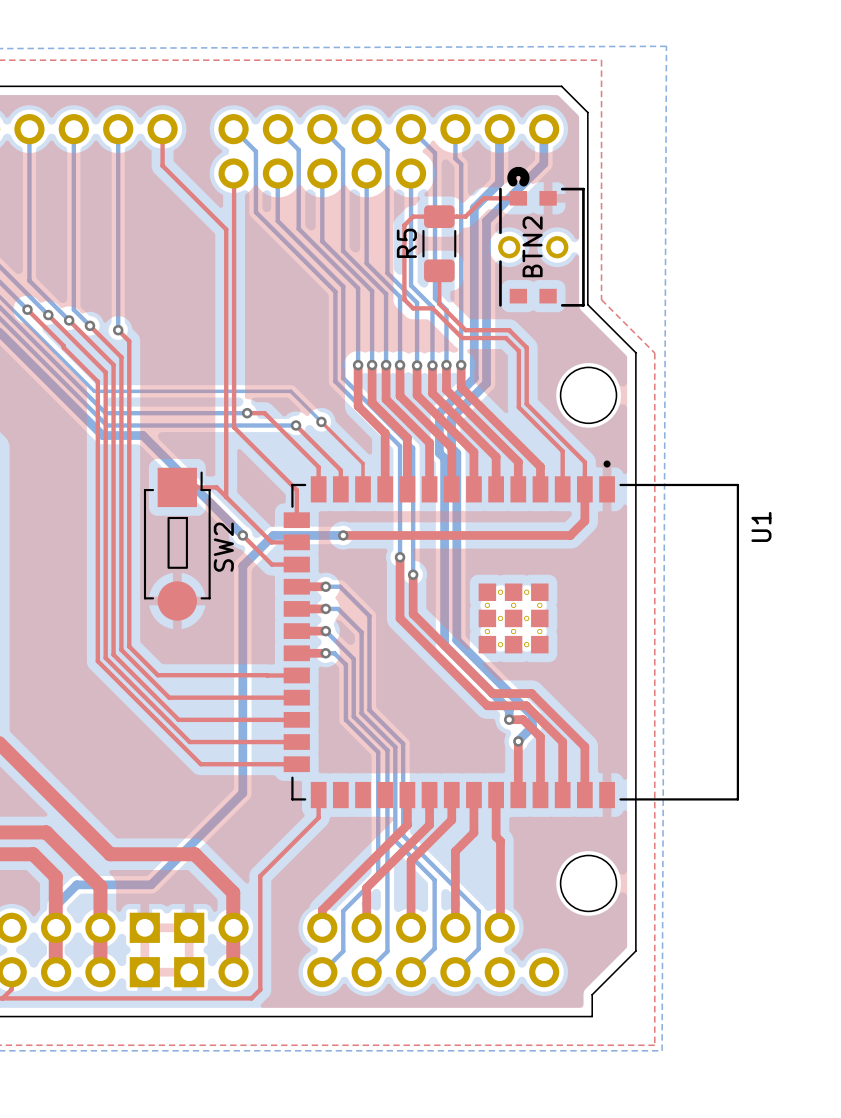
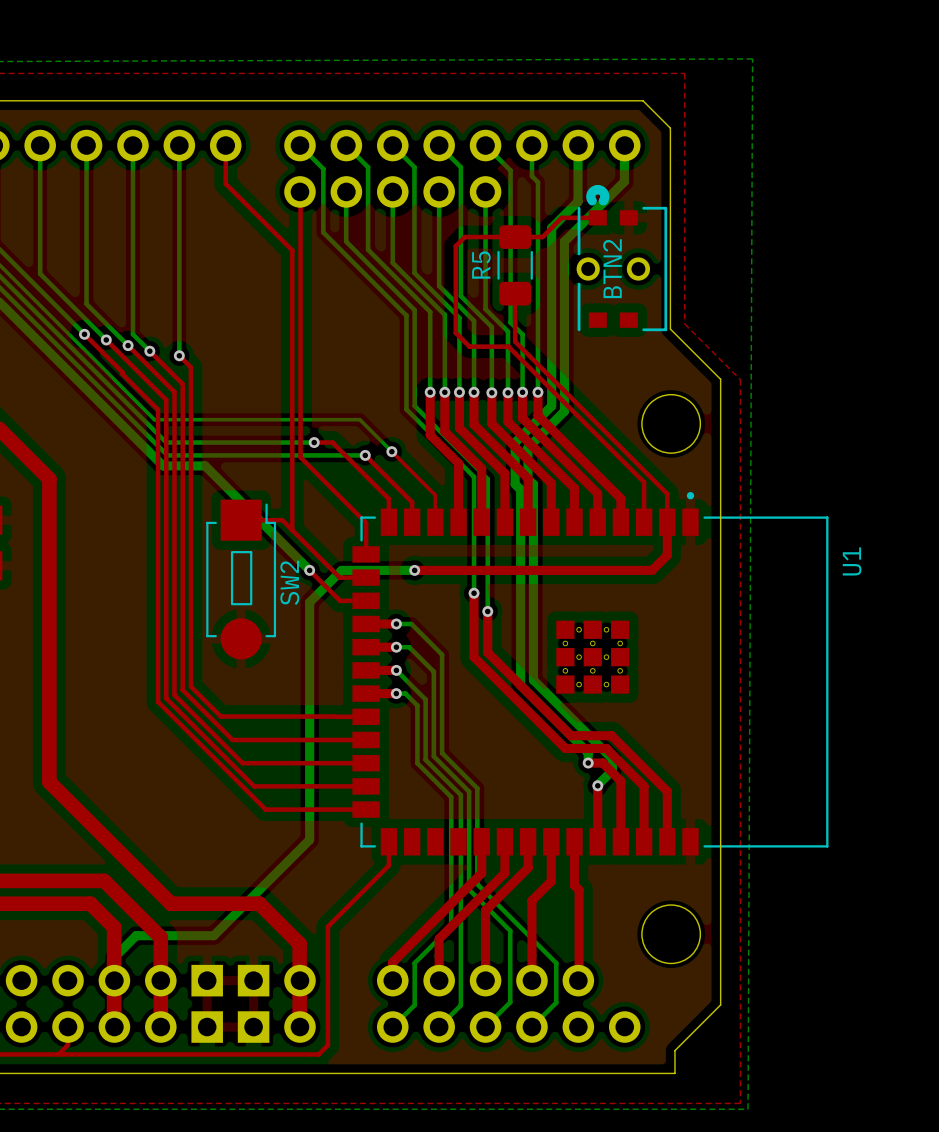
top track: (413, 216) (404, 225) (404, 299) (413, 308) (432, 308) (462, 338) (505, 338) (518, 350) (518, 407) -> (487, 237) (464, 237) (455, 246) (455, 332) (469, 346) (508, 346) (598, 436)
top track: (439, 304) (465, 330) (509, 330) (526, 347) (526, 404) -> (515, 328) (515, 341) (606, 433)

